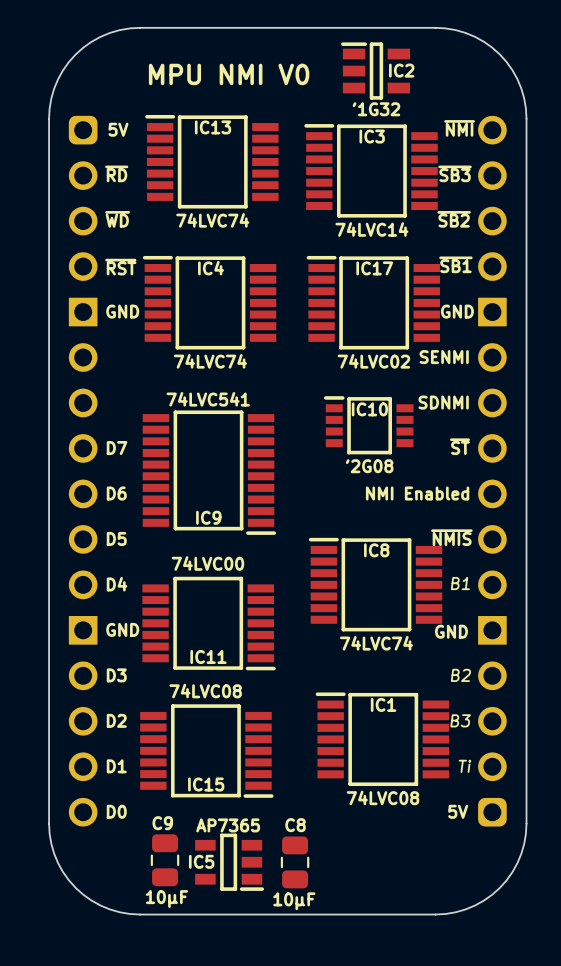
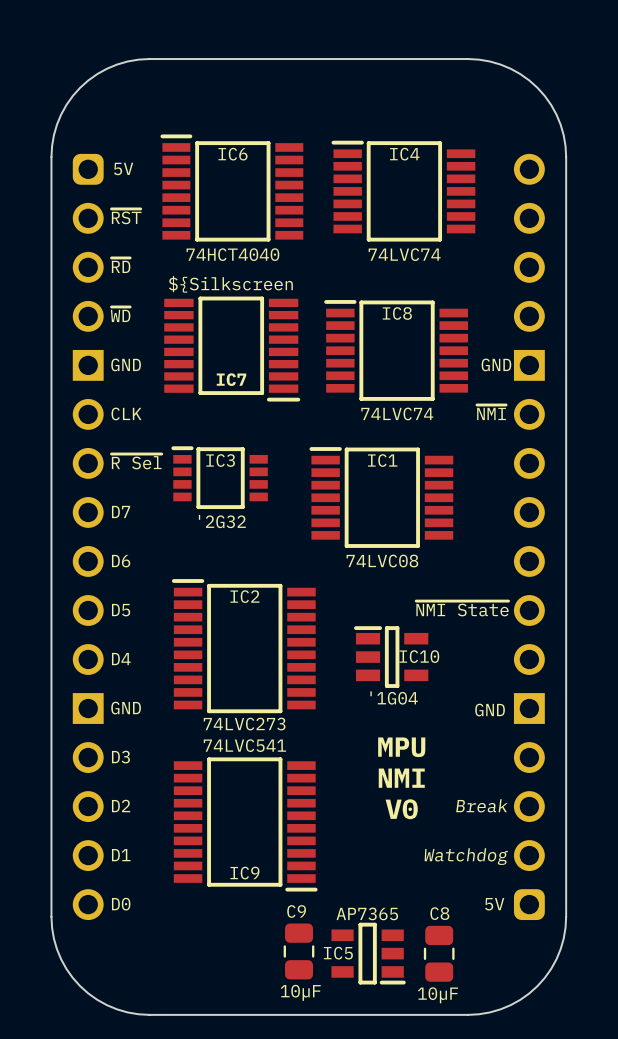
IC2 footprint: [341, 42, 411, 100] -> [171, 579, 316, 714]
IC2 name position: IC2 (401, 70) -> IC2 (244, 596)
text: MPU NMI V0 (229, 74) -> none
IC3 footprint: [304, 124, 438, 218] -> [171, 446, 268, 510]
text: ~{NMI} (459, 128) -> none
IC6: none -> (231, 188)
IC13: (211, 161) -> none
text: ~{RD} (116, 173) -> ~{RST} (126, 216)
text: ~{SB3} (455, 173) -> none
text: ~{WD} (117, 219) -> ~{RD} (120, 265)
text: ~{SB2} (454, 219) -> none
text: ~{SB1} (455, 264) -> none
text: ~{RST} (120, 267) -> ~{WD} (120, 314)
IC7: none -> (232, 349)
IC4 position: (209, 302) -> (403, 191)
IC17: (373, 302) -> none
text: none -> CLK (126, 413)
text: SENMI (444, 357) -> ~{NMI} (491, 412)
IC10 footprint: [323, 396, 414, 455] -> [354, 626, 429, 688]
text: none -> ~{R Sel} (136, 461)
text: SDNMI (443, 402) -> none
text: ~{ST} (460, 446) -> none
IC9 position: (209, 472) -> (245, 824)
text: NMI Enabled (417, 493) -> none
text: ~{NMIS} (451, 537) -> ~{NMI State} (462, 608)
text: B1 (460, 583) -> none
IC8 position: (375, 584) -> (396, 350)
IC11: (209, 623) -> none
text: none -> MPU (401, 747)
text: B2 (460, 675) -> none
text: none -> NMI (401, 778)
text: B3 (460, 720) -> Break (481, 805)
text: none -> V0 (401, 809)
IC1 position: (382, 739) -> (381, 497)
IC15: (206, 751) -> none
text: Ti (465, 766) -> Watchdog (466, 856)
C9 position: (165, 860) -> (299, 951)
IC5 position: (229, 862) -> (368, 953)
C8 position: (295, 862) -> (439, 953)

